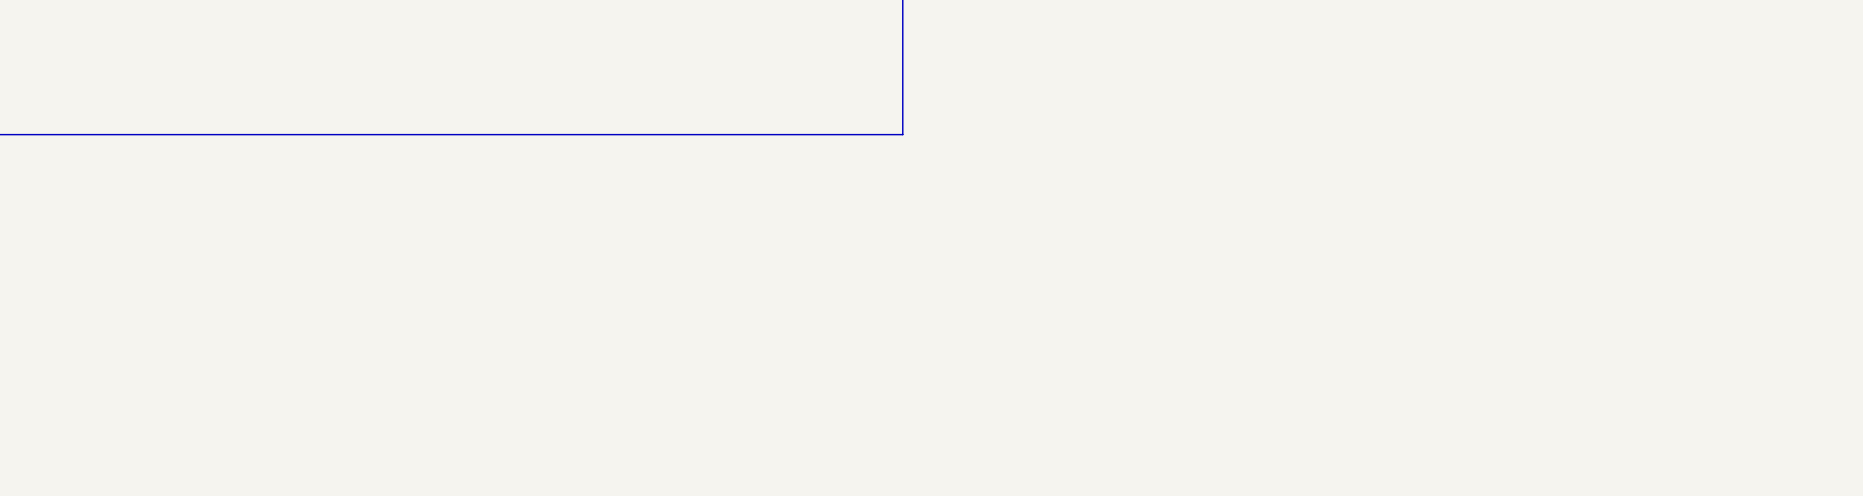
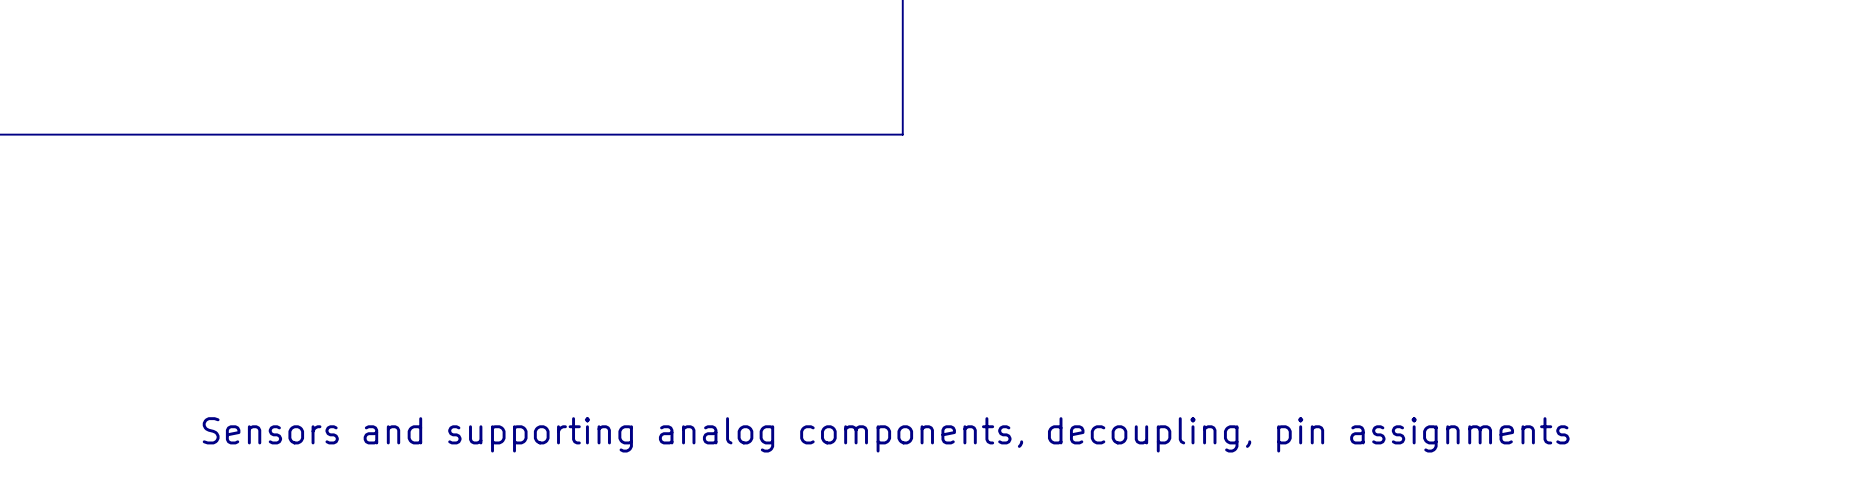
text: none -> Sensors and supporting analog components, decoupling, pin assignments (886, 434)

